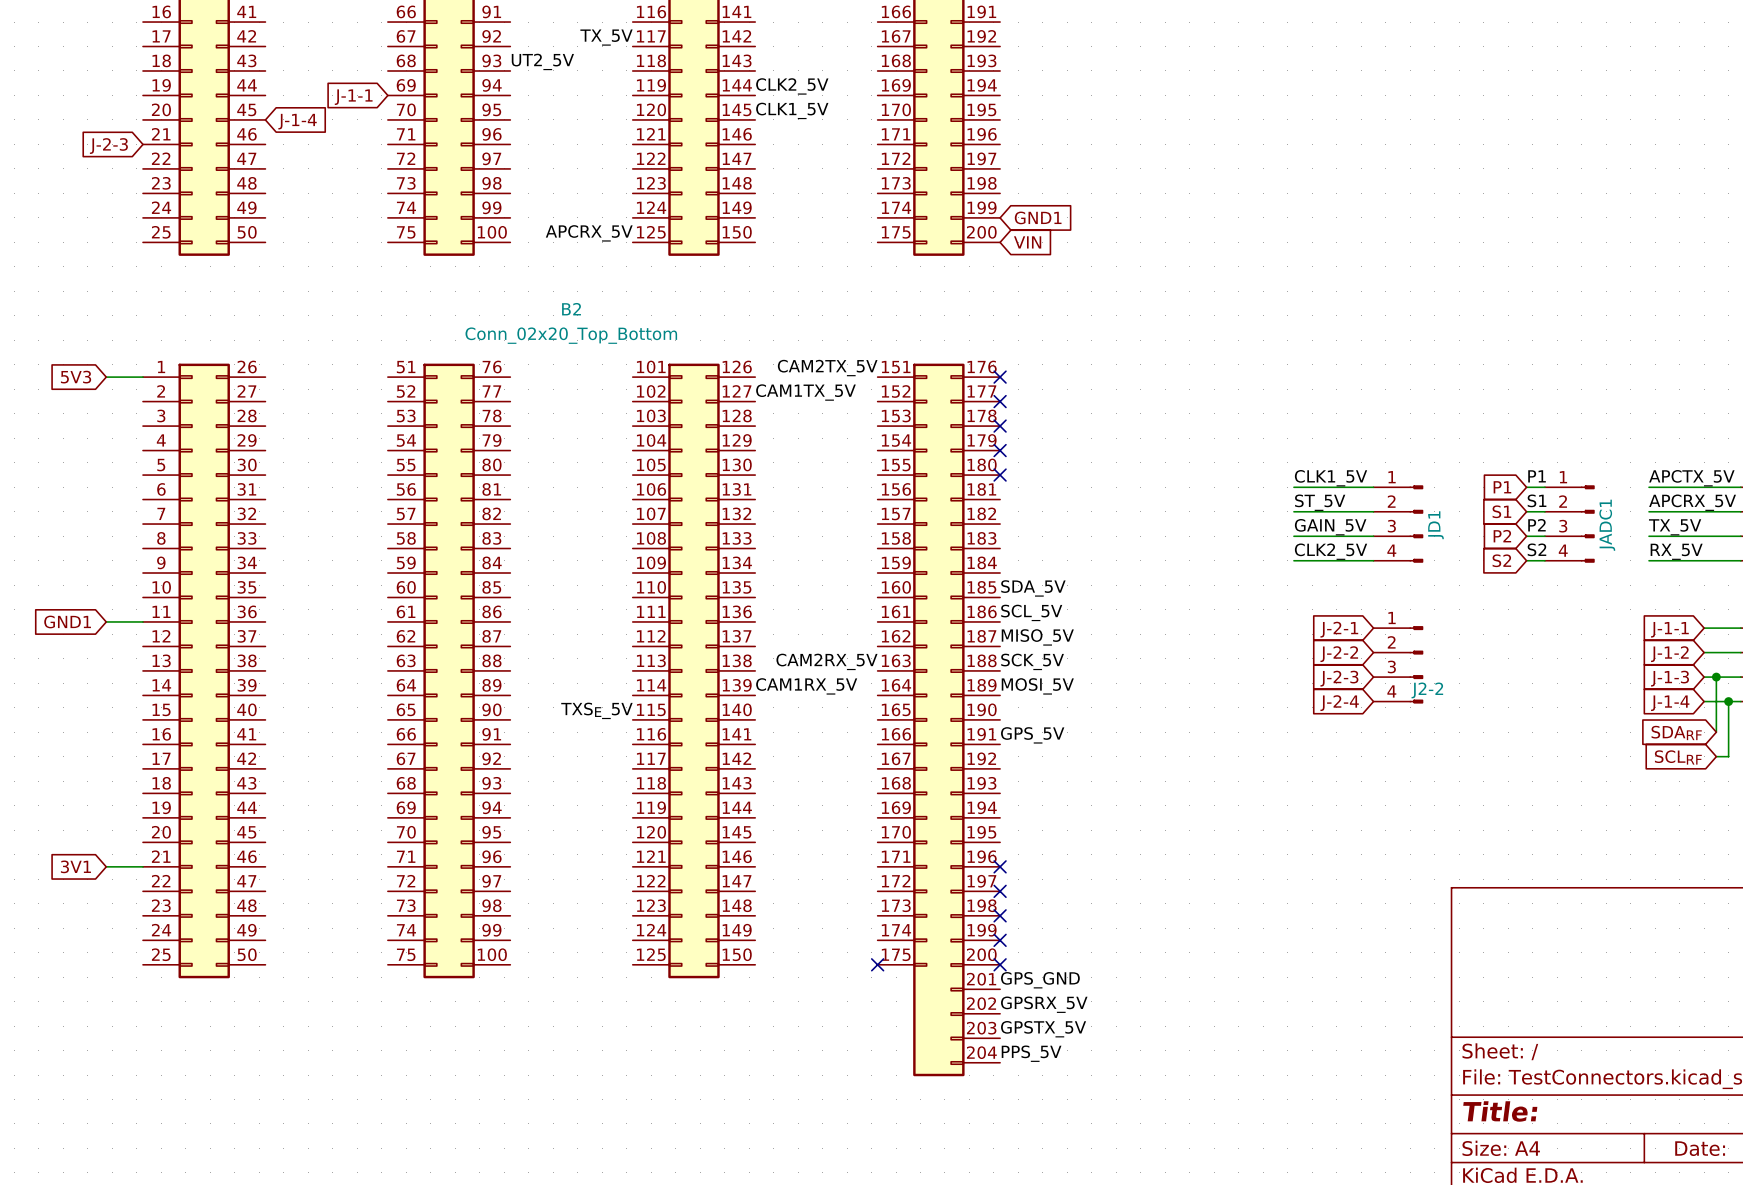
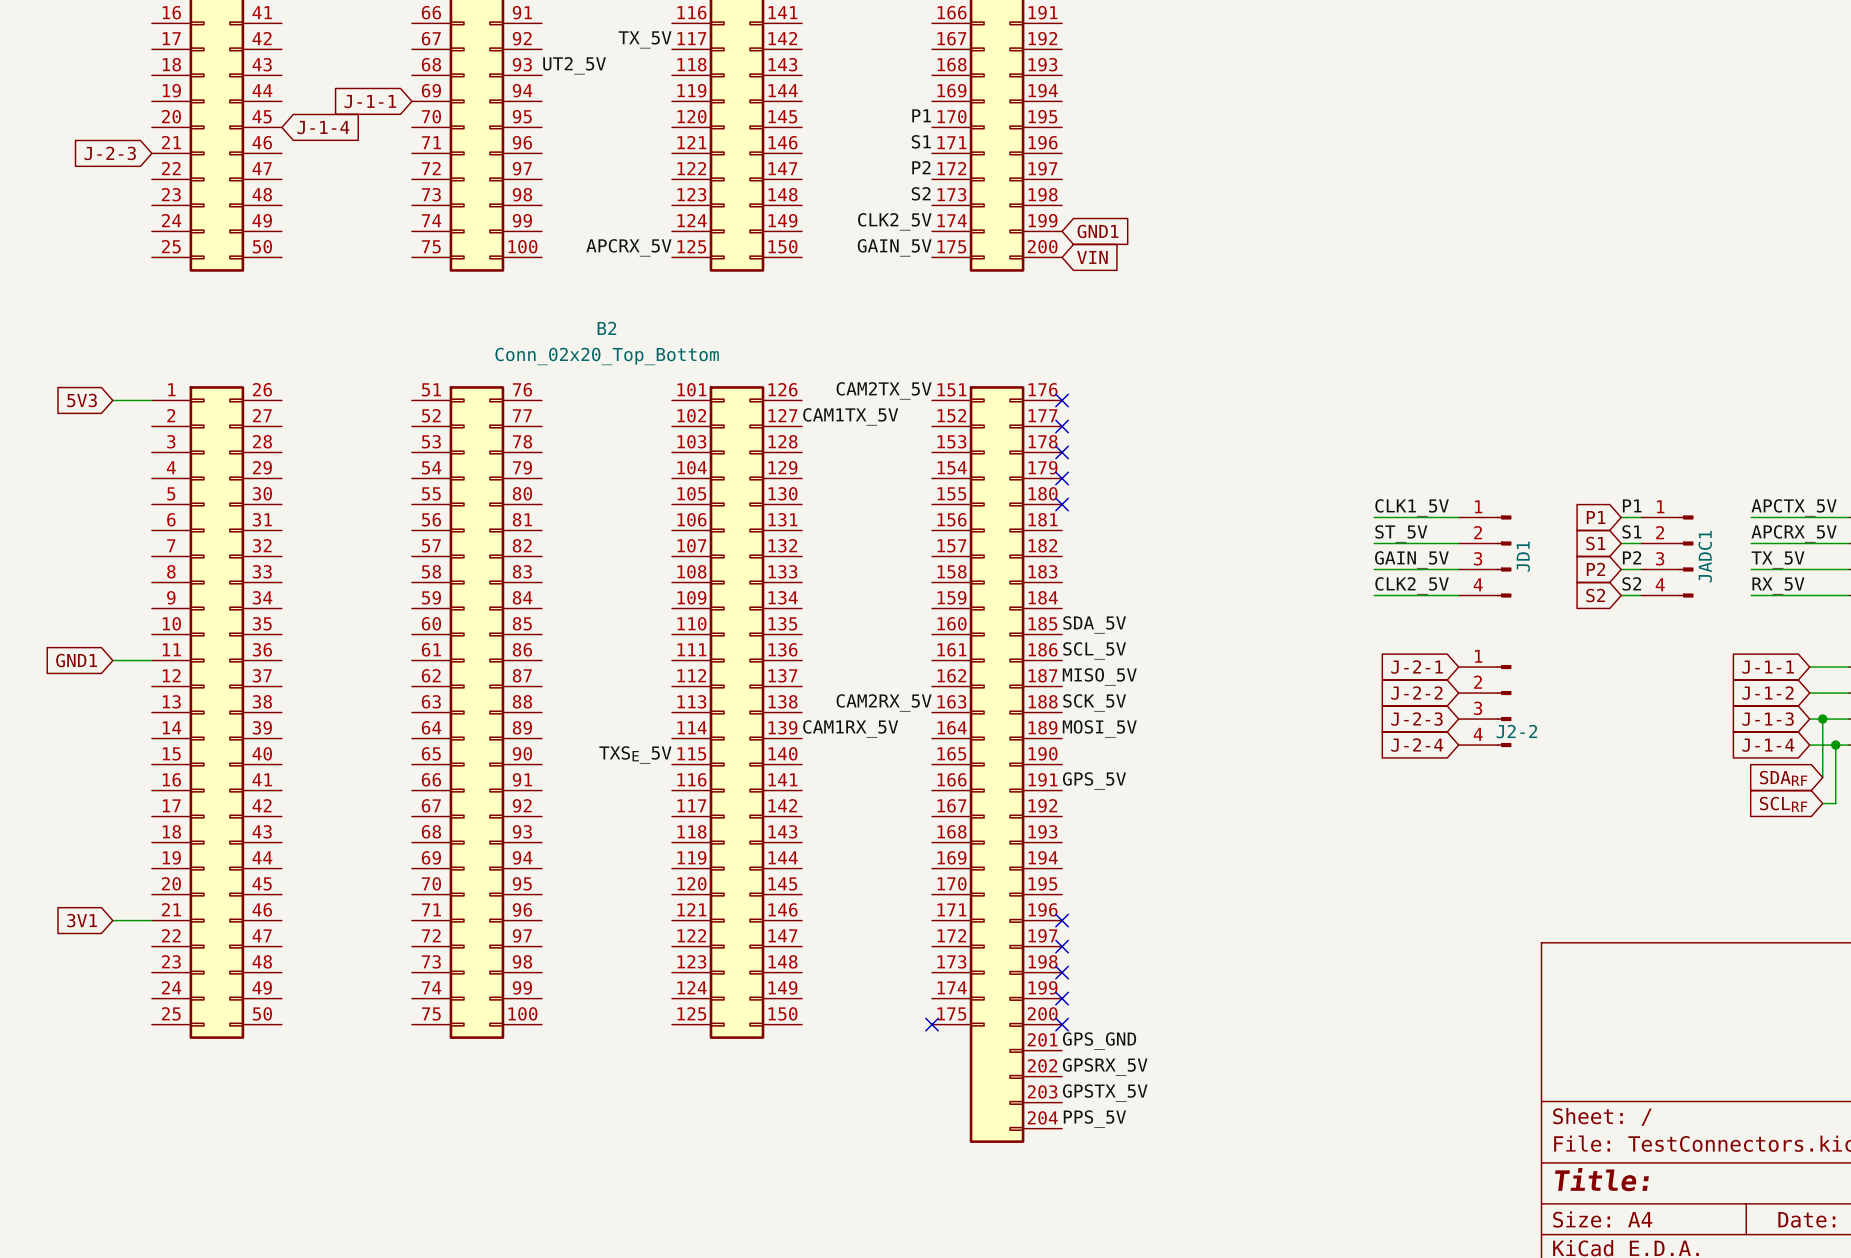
label position: CLK2_5V (792, 86) -> CLK2_5V (894, 221)
label: none -> P1 (921, 115)
label: CLK1_5V (792, 110) -> none
label: none -> S1 (921, 141)
label: none -> P2 (921, 167)
label: none -> S2 (921, 193)
label: none -> GAIN_5V (894, 247)

